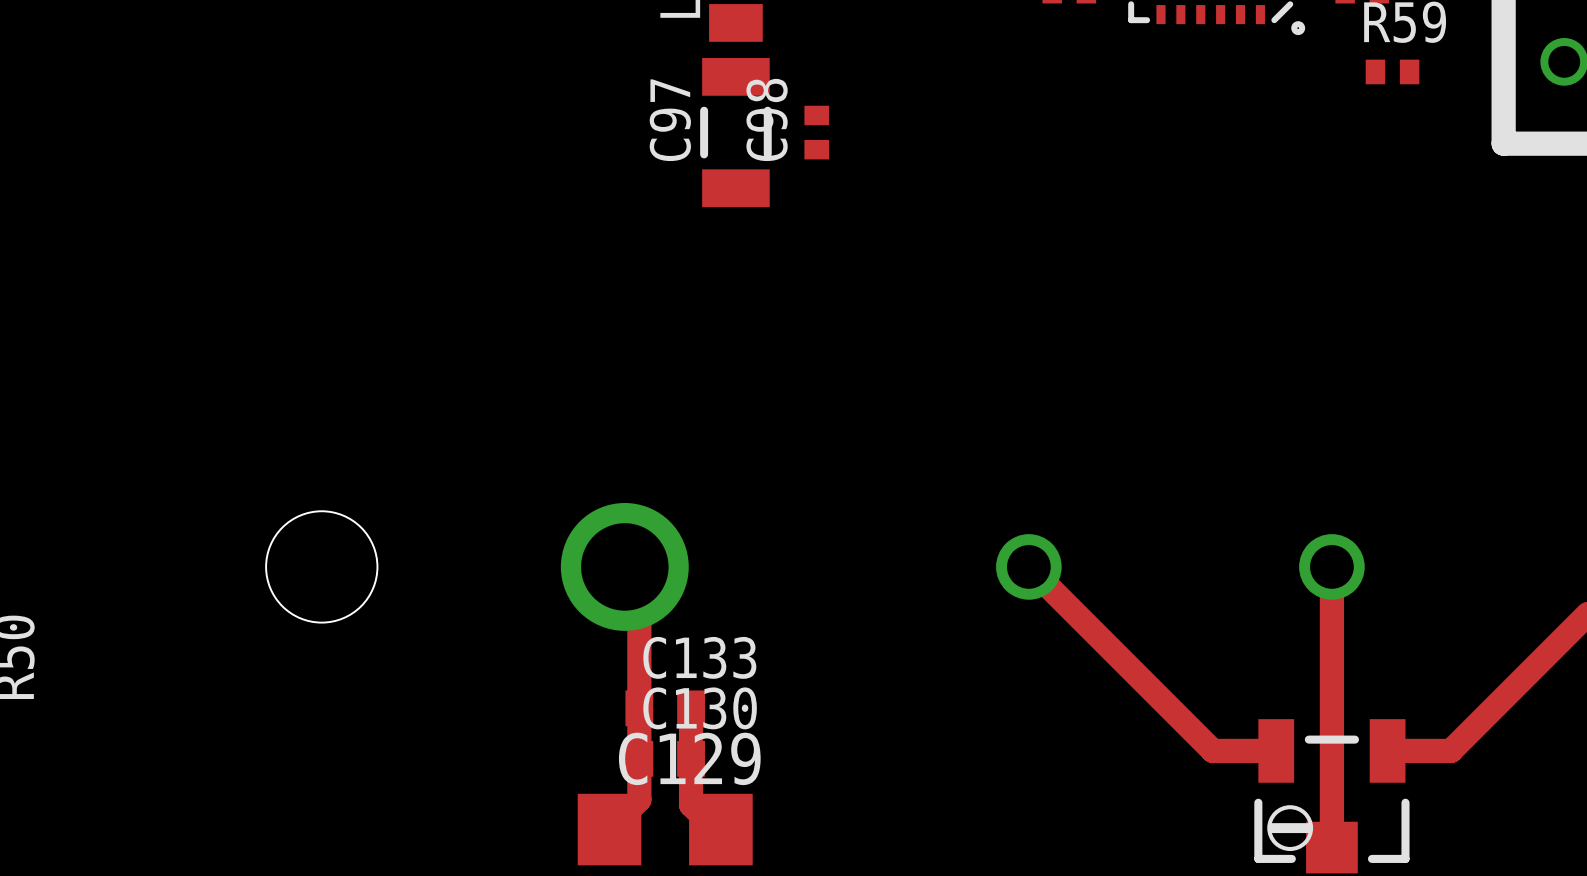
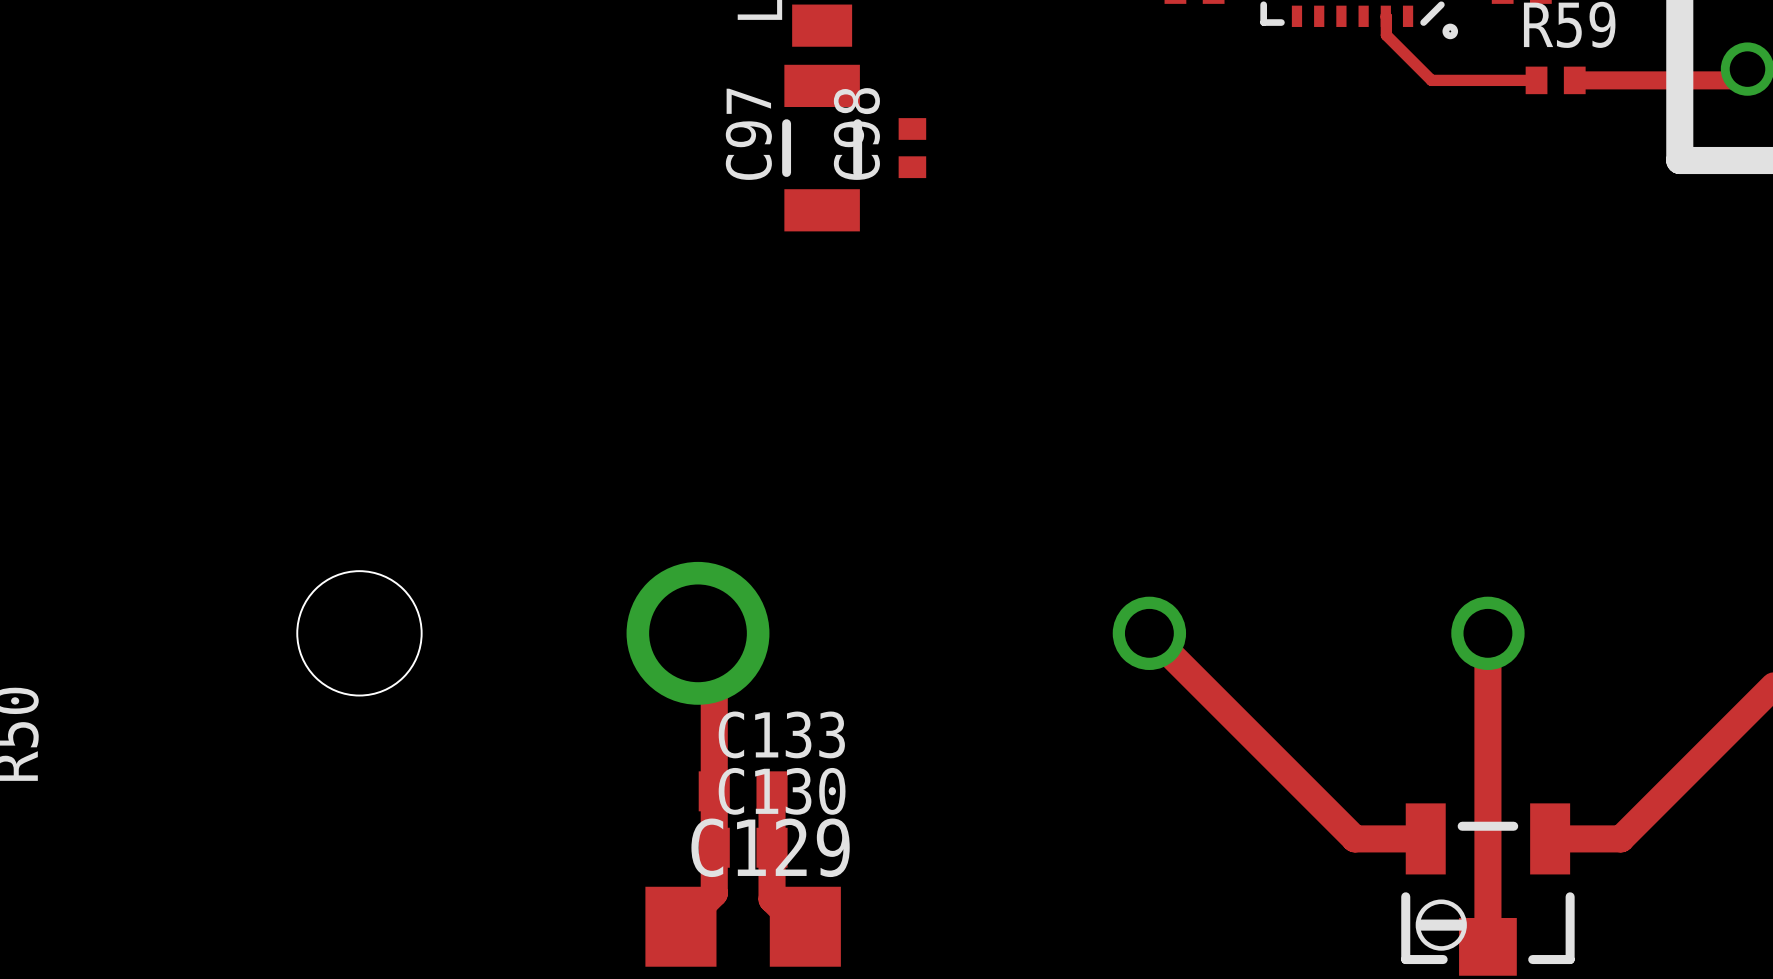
top track: none -> (1386, 16) (1386, 35) (1431, 80) (1536, 80)
top track: none -> (1747, 69) (1736, 80) (1574, 80)

